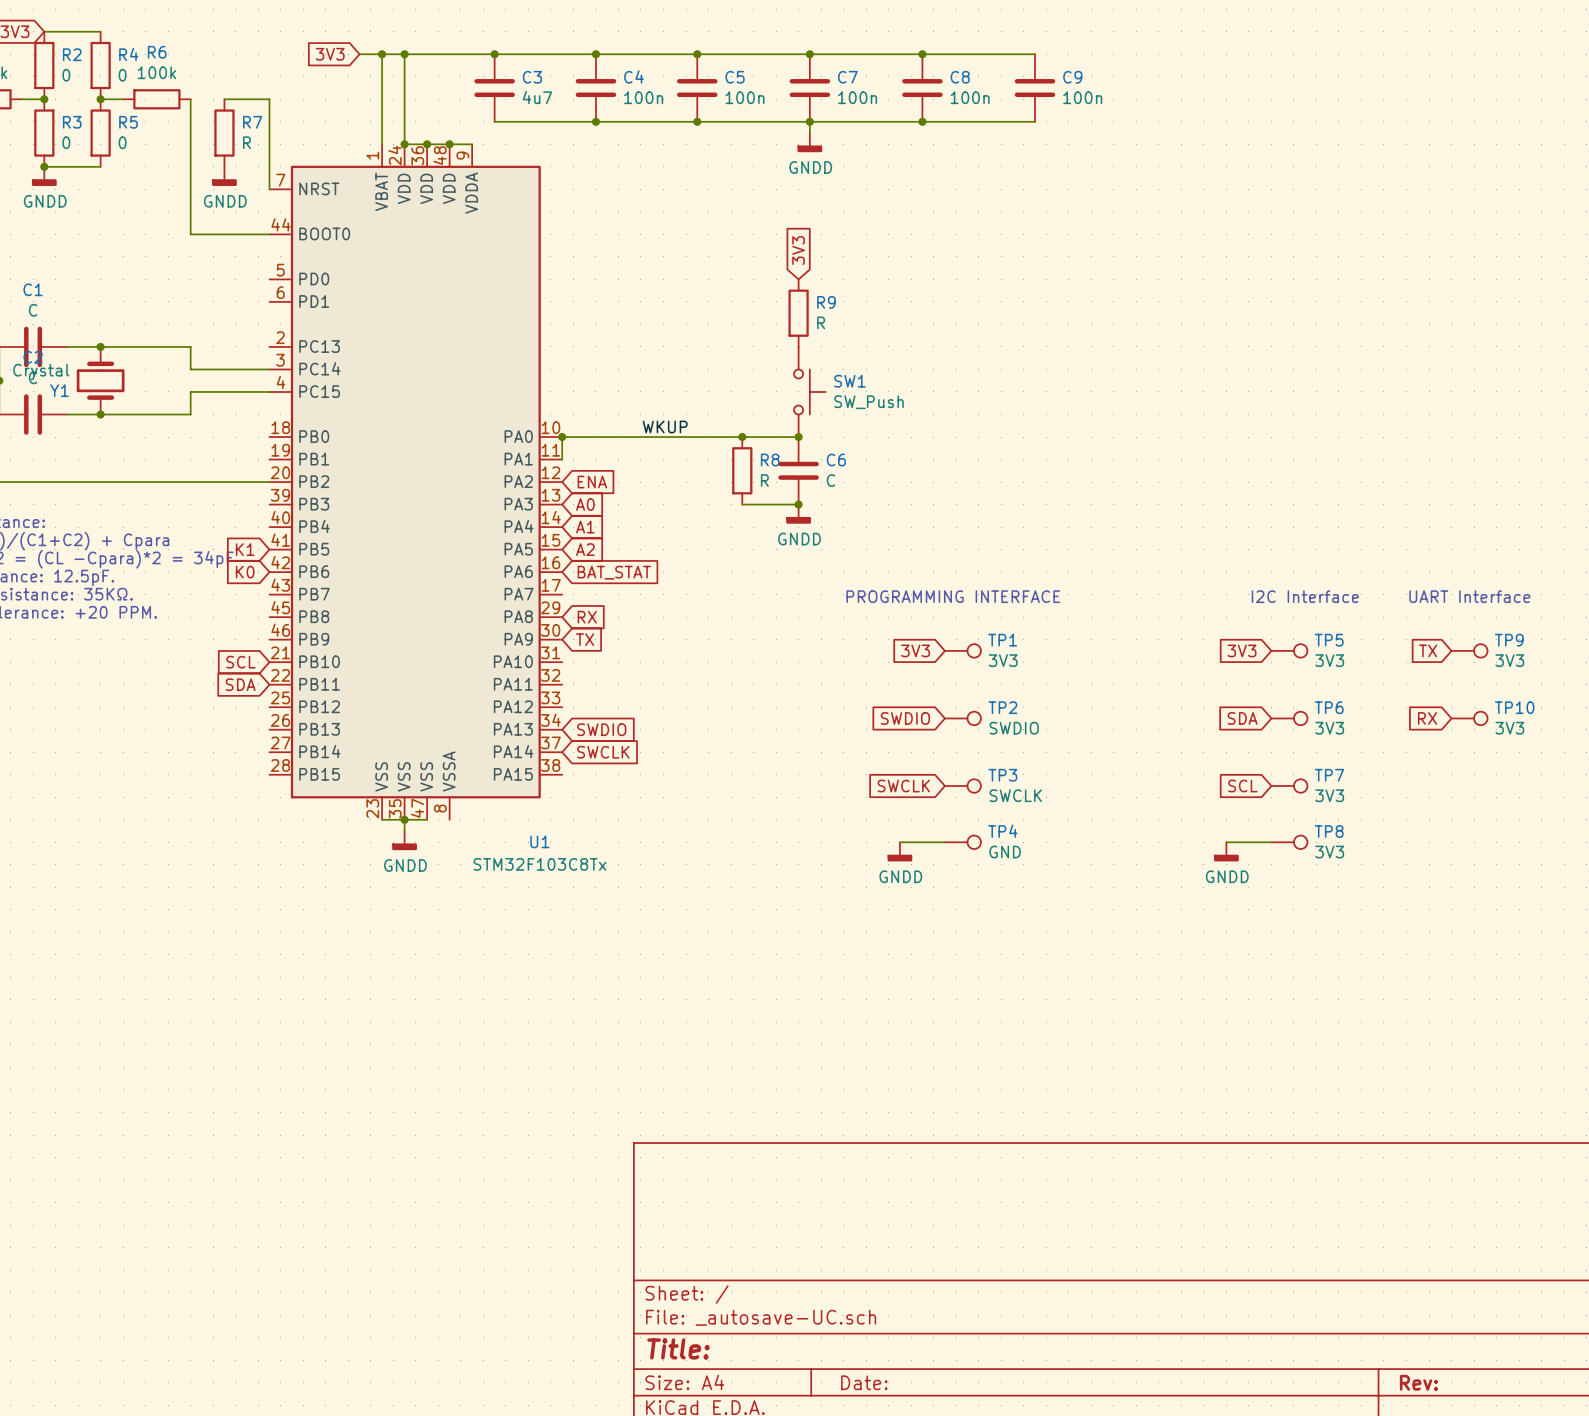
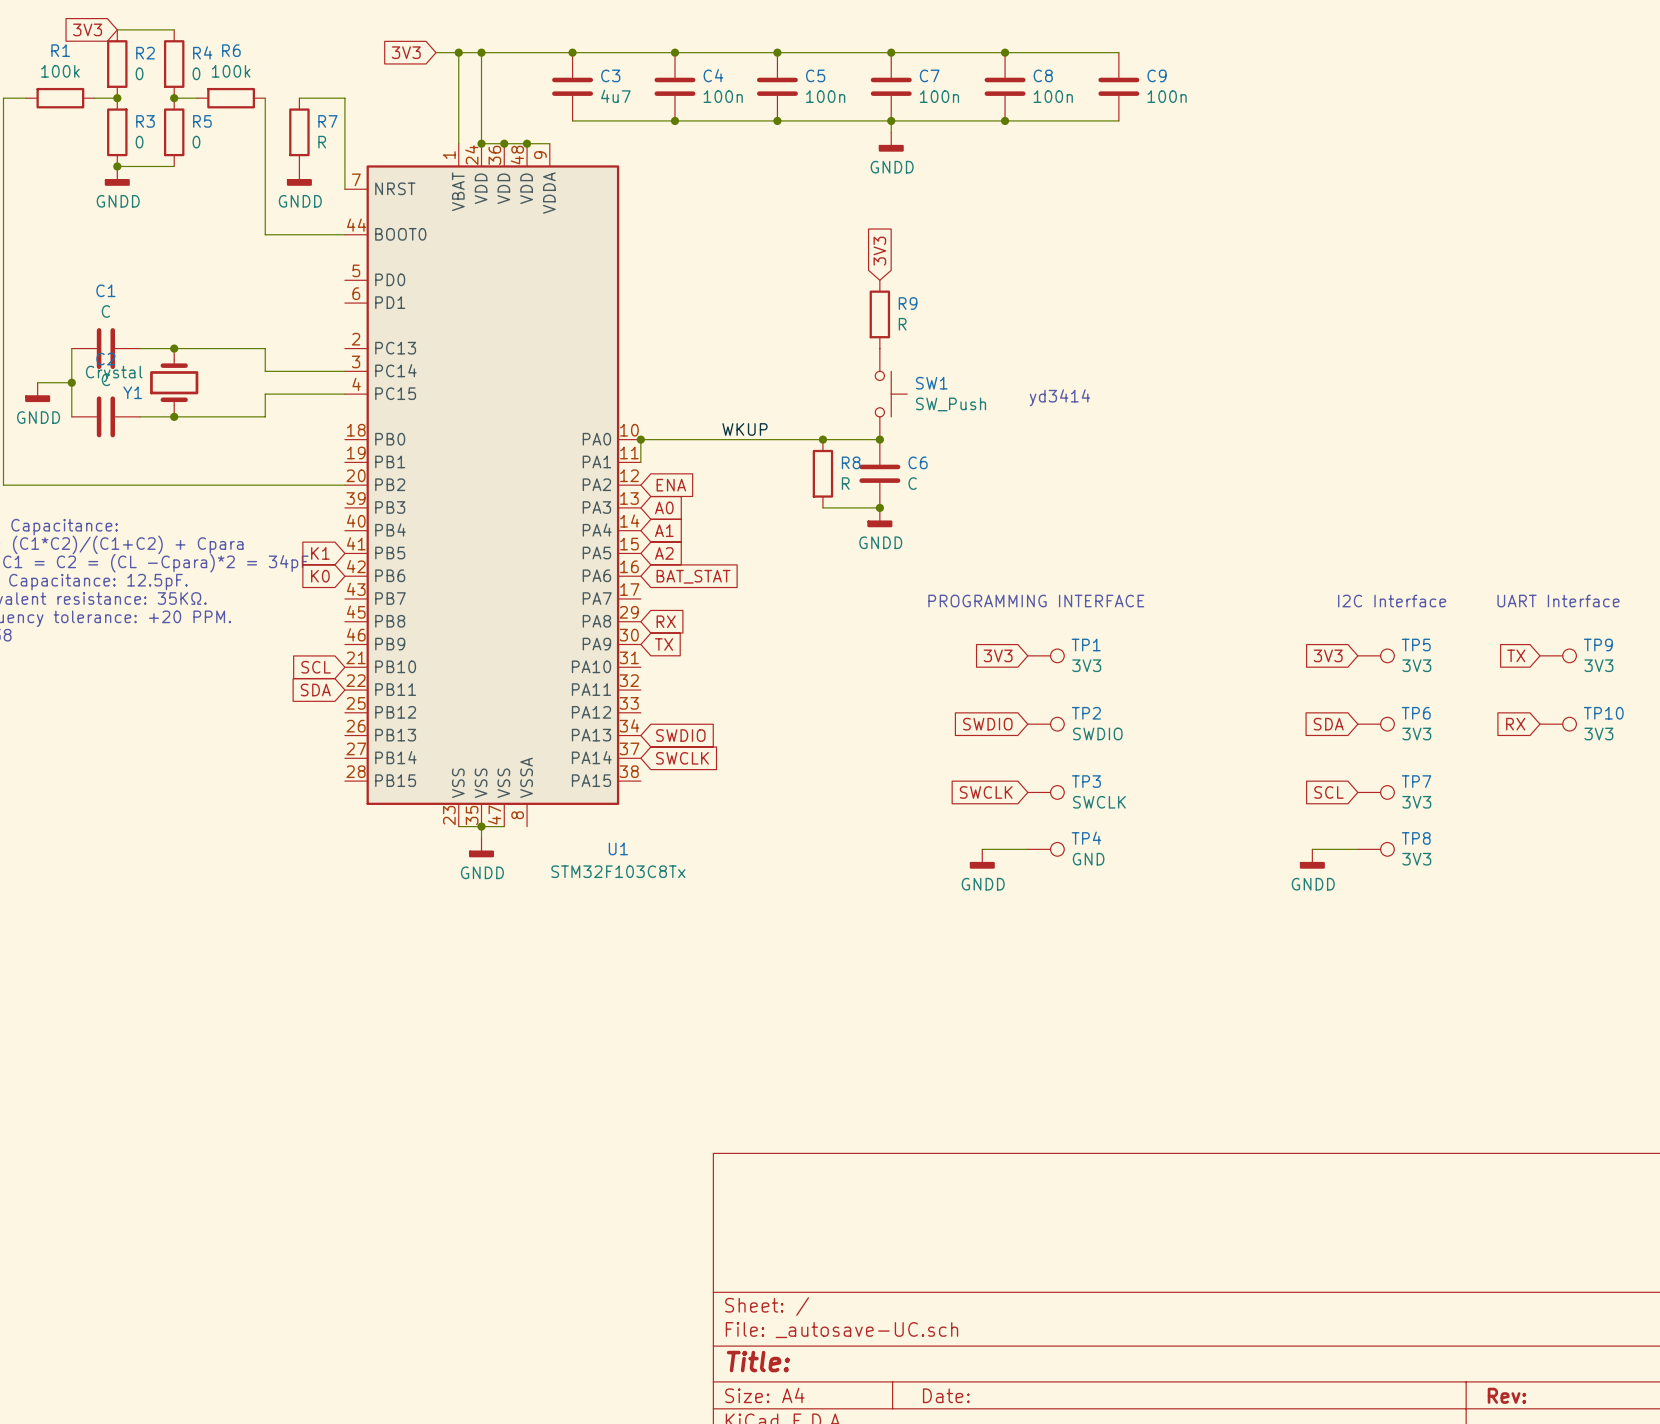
text: none -> yd3414 (1059, 397)

